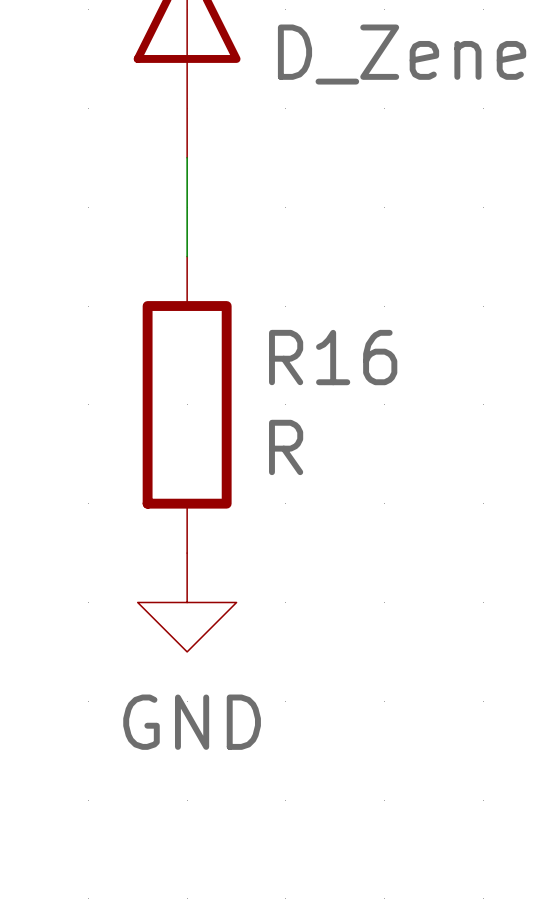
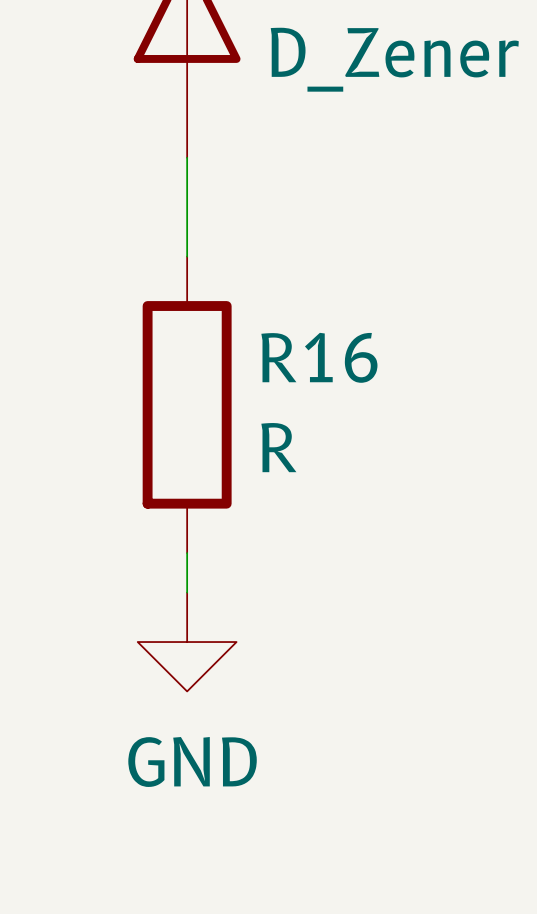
power symbol position: GND (187, 602) -> GND (187, 642)

